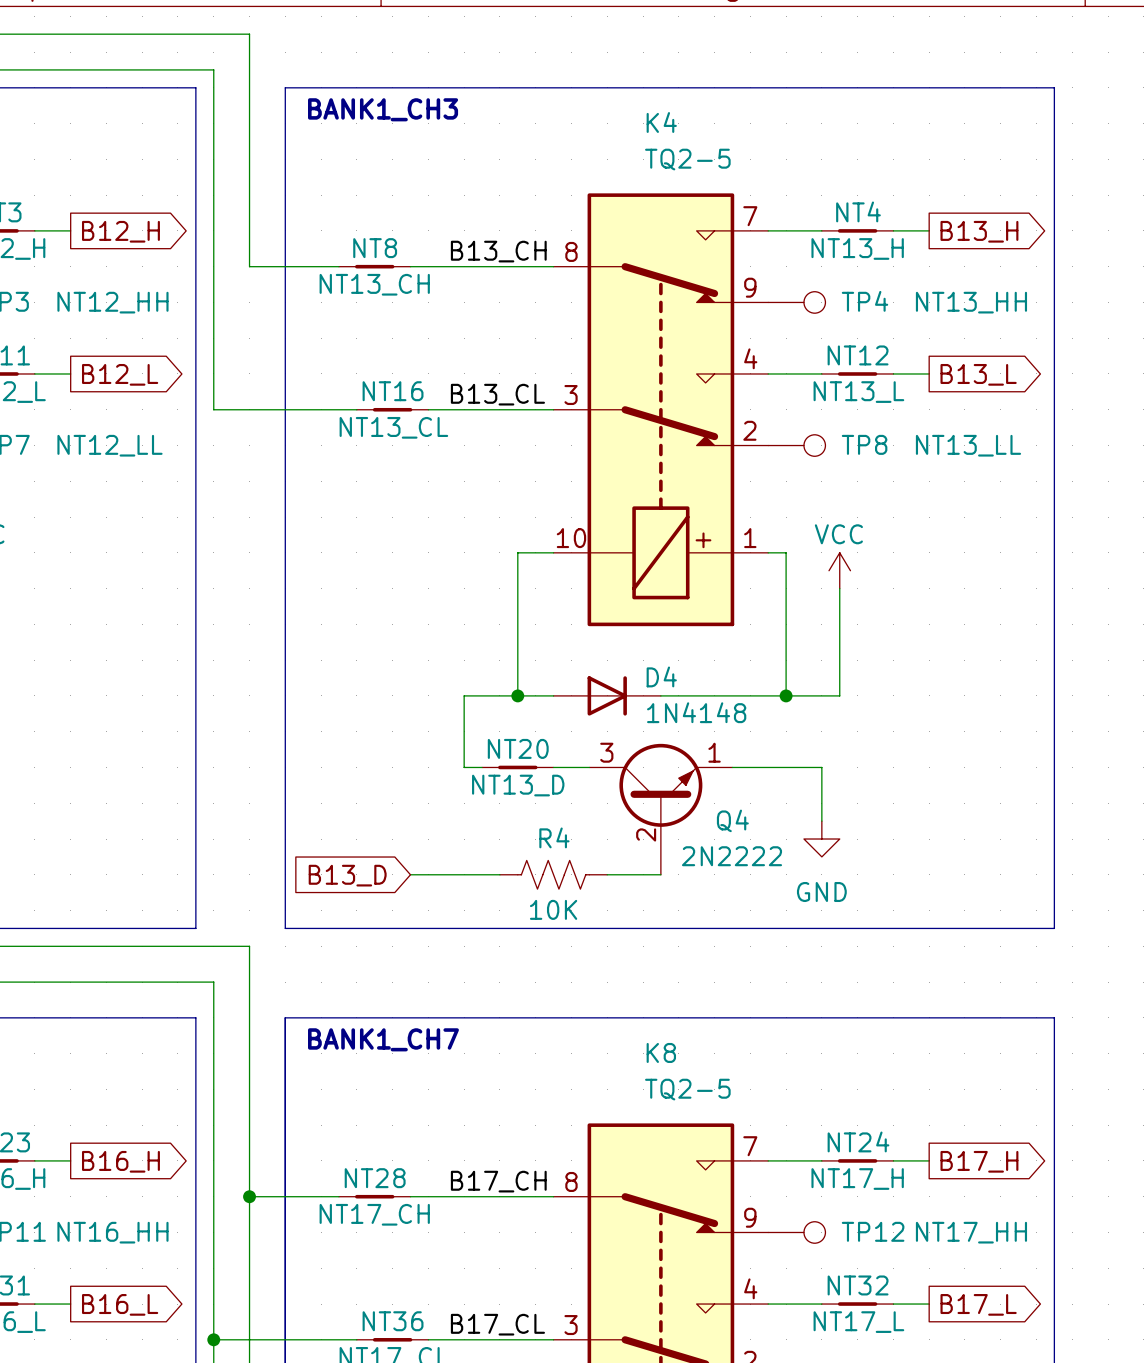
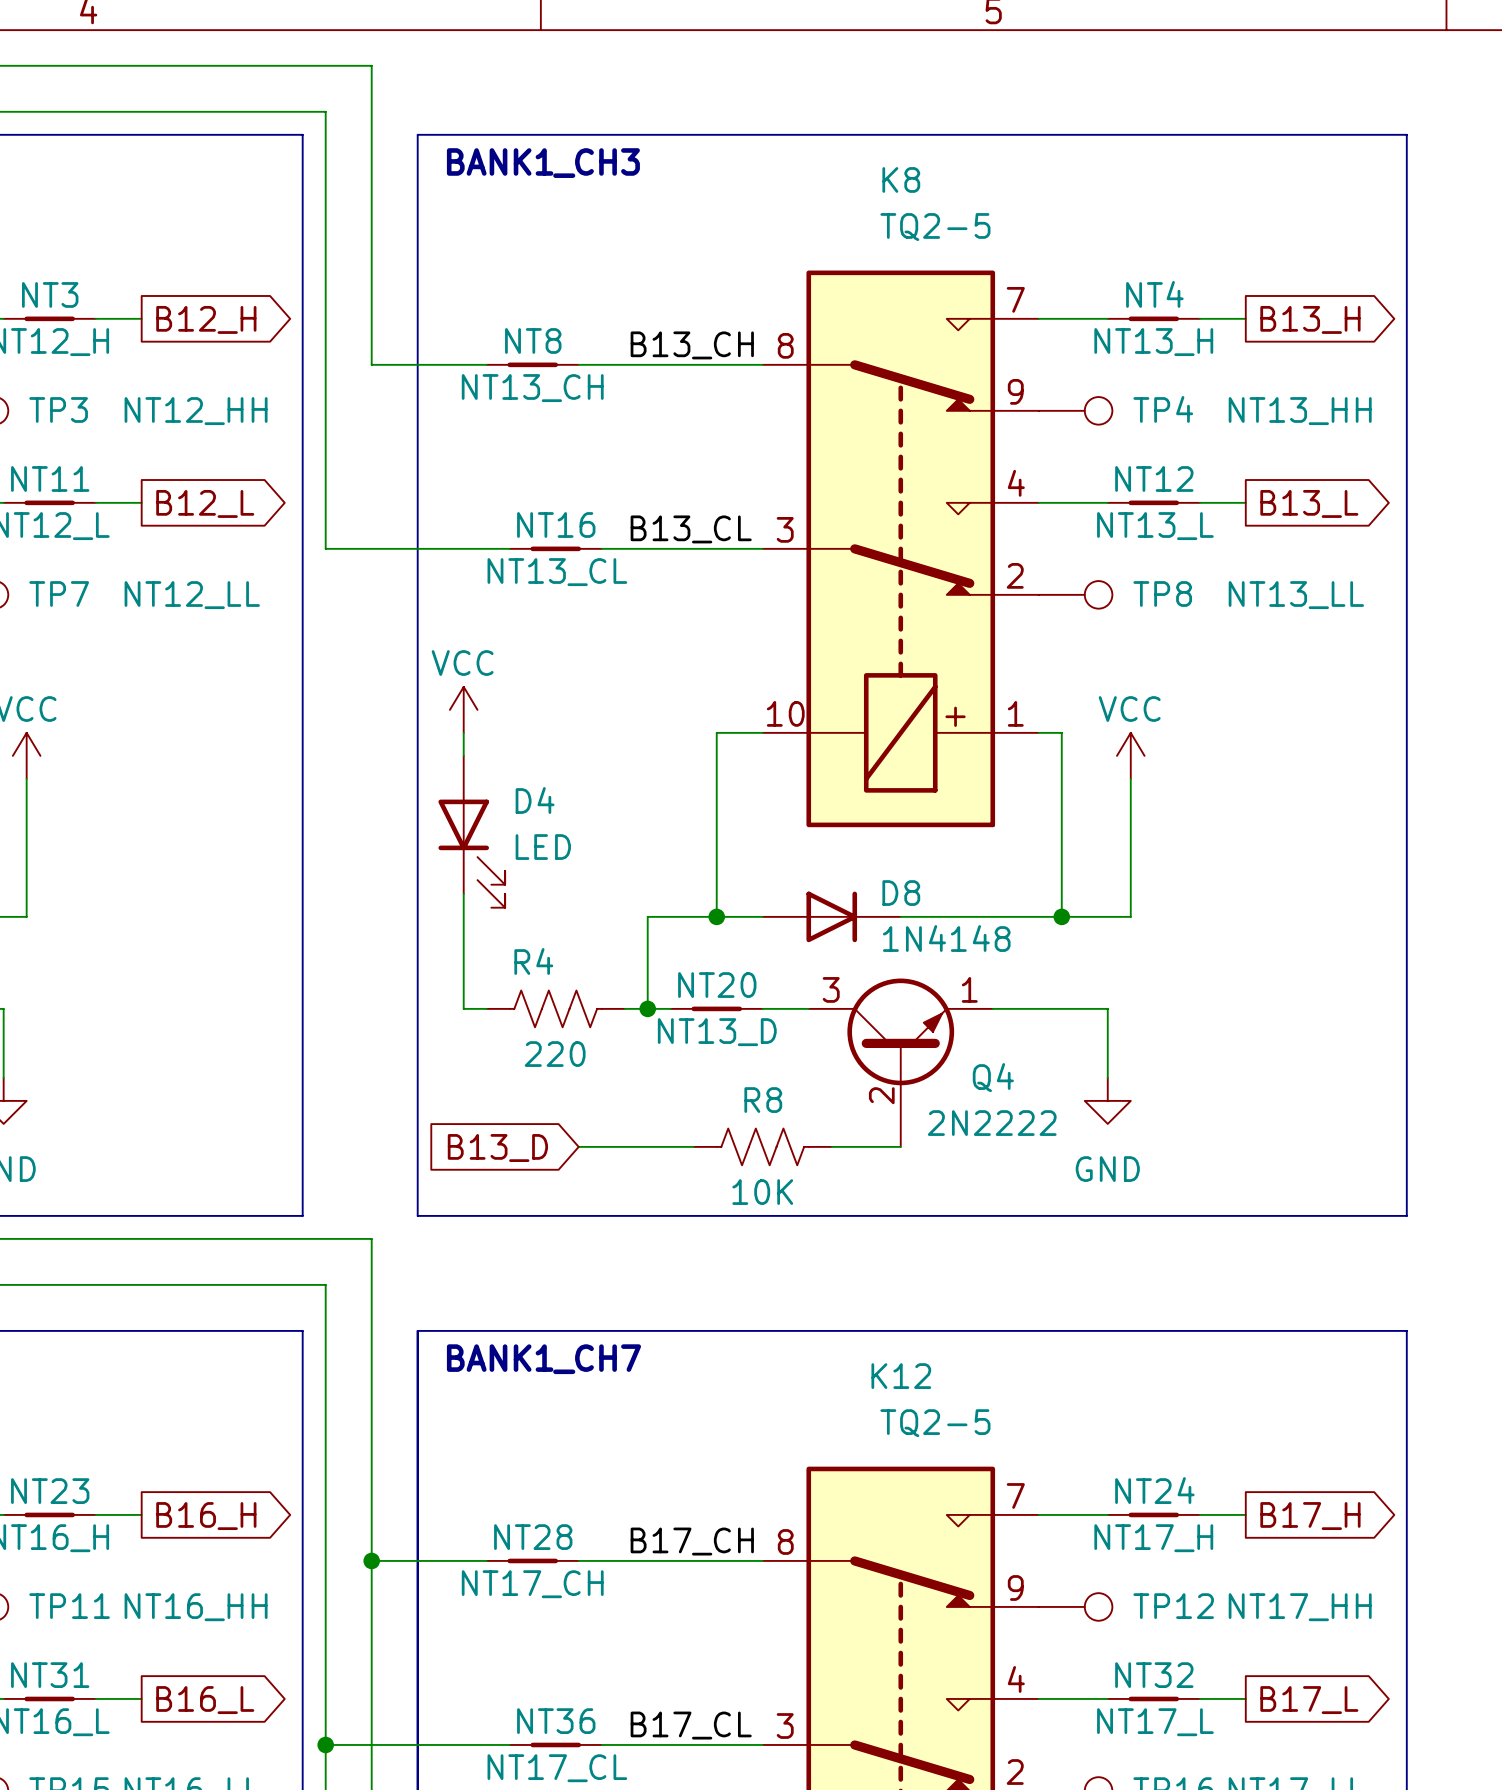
K4 name: K4 (661, 122) -> K8 (901, 179)
power symbol: none -> VCC (463, 709)
wire: none -> (463, 732) (463, 755)
D4: none -> LED (471, 831)
D4 name: D4 (661, 676) -> D8 (901, 893)
wire: none -> (463, 893) (463, 1008) (486, 1008)
R4: none -> 220 (555, 1008)
wire: none -> (624, 1008) (647, 1008)
junction: none -> (647, 1008)
R4 name: R4 (554, 837) -> R8 (763, 1100)
K8 name: K8 (661, 1052) -> K12 (901, 1376)

